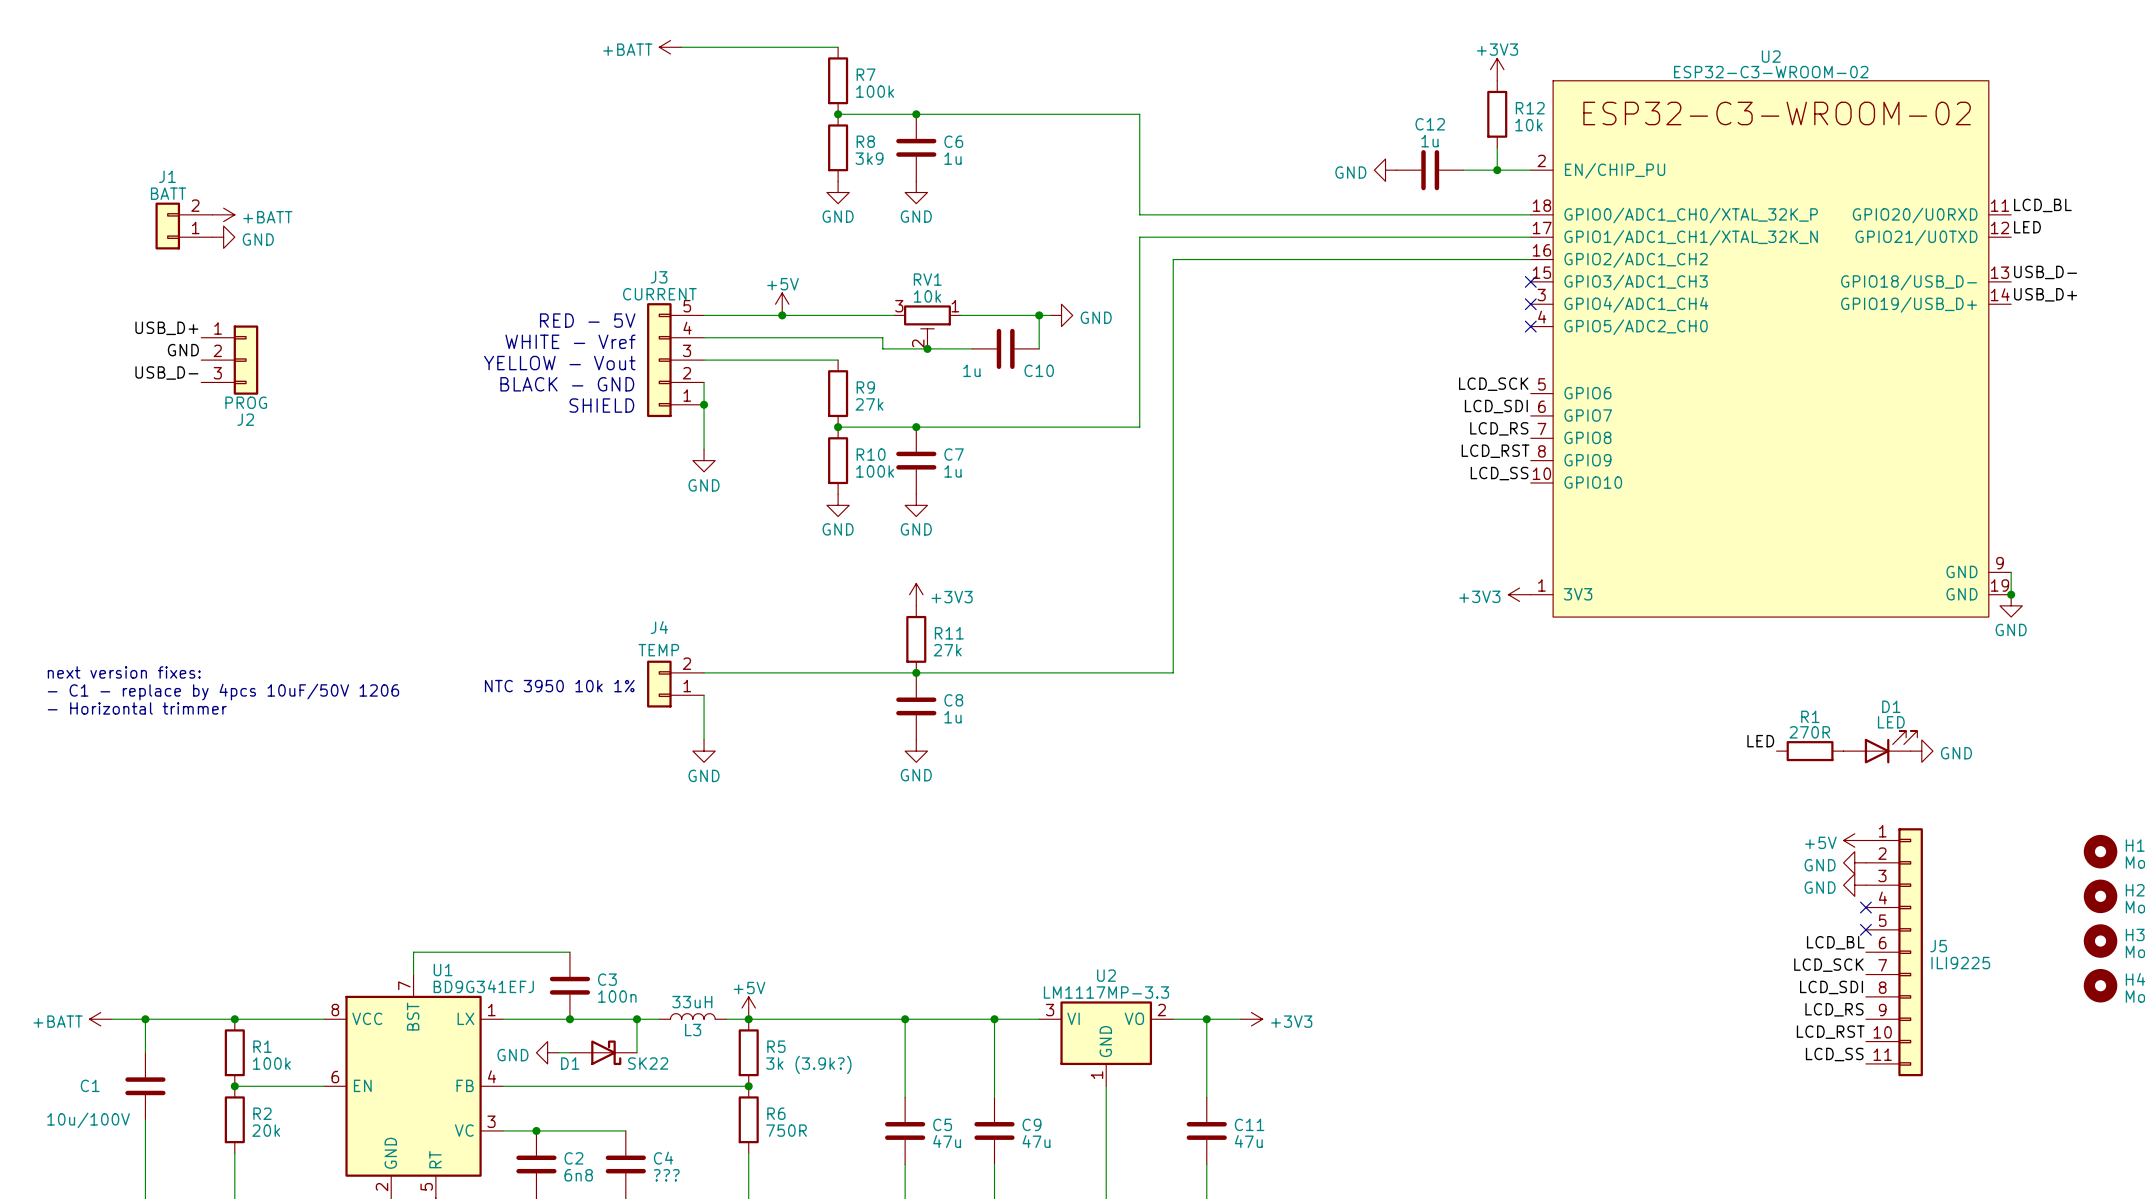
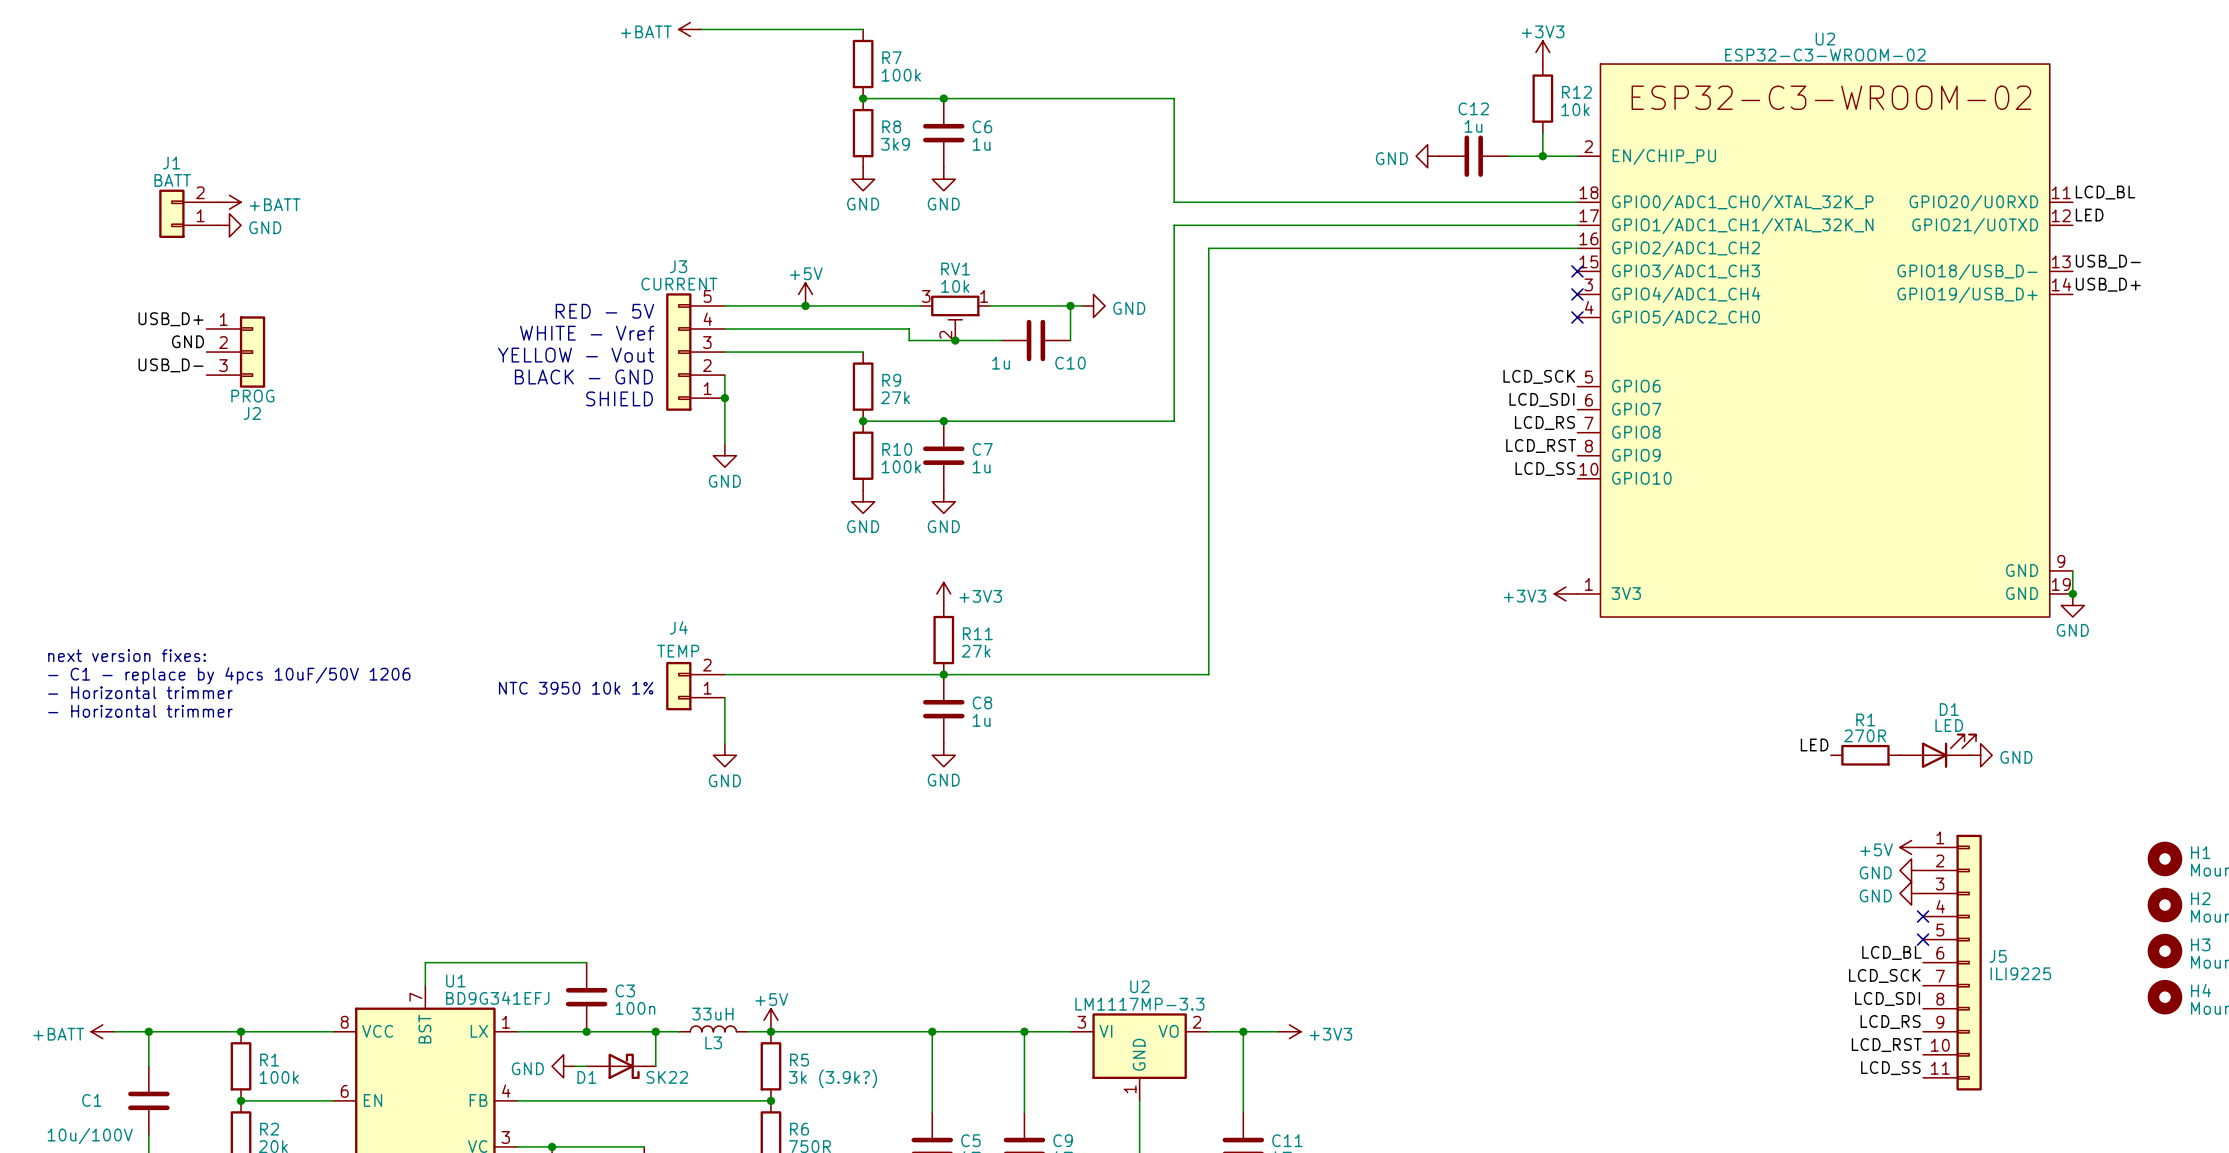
text: none -> next version fixes: (127, 655)
text: next version fixes: (124, 672) -> - C1 - replace by 4pcs 10uF/50V 1206 (229, 675)
text: - C1 - replace by 4pcs 10uF/50V 1206 (223, 692) -> - Horizontal trimmer (140, 692)

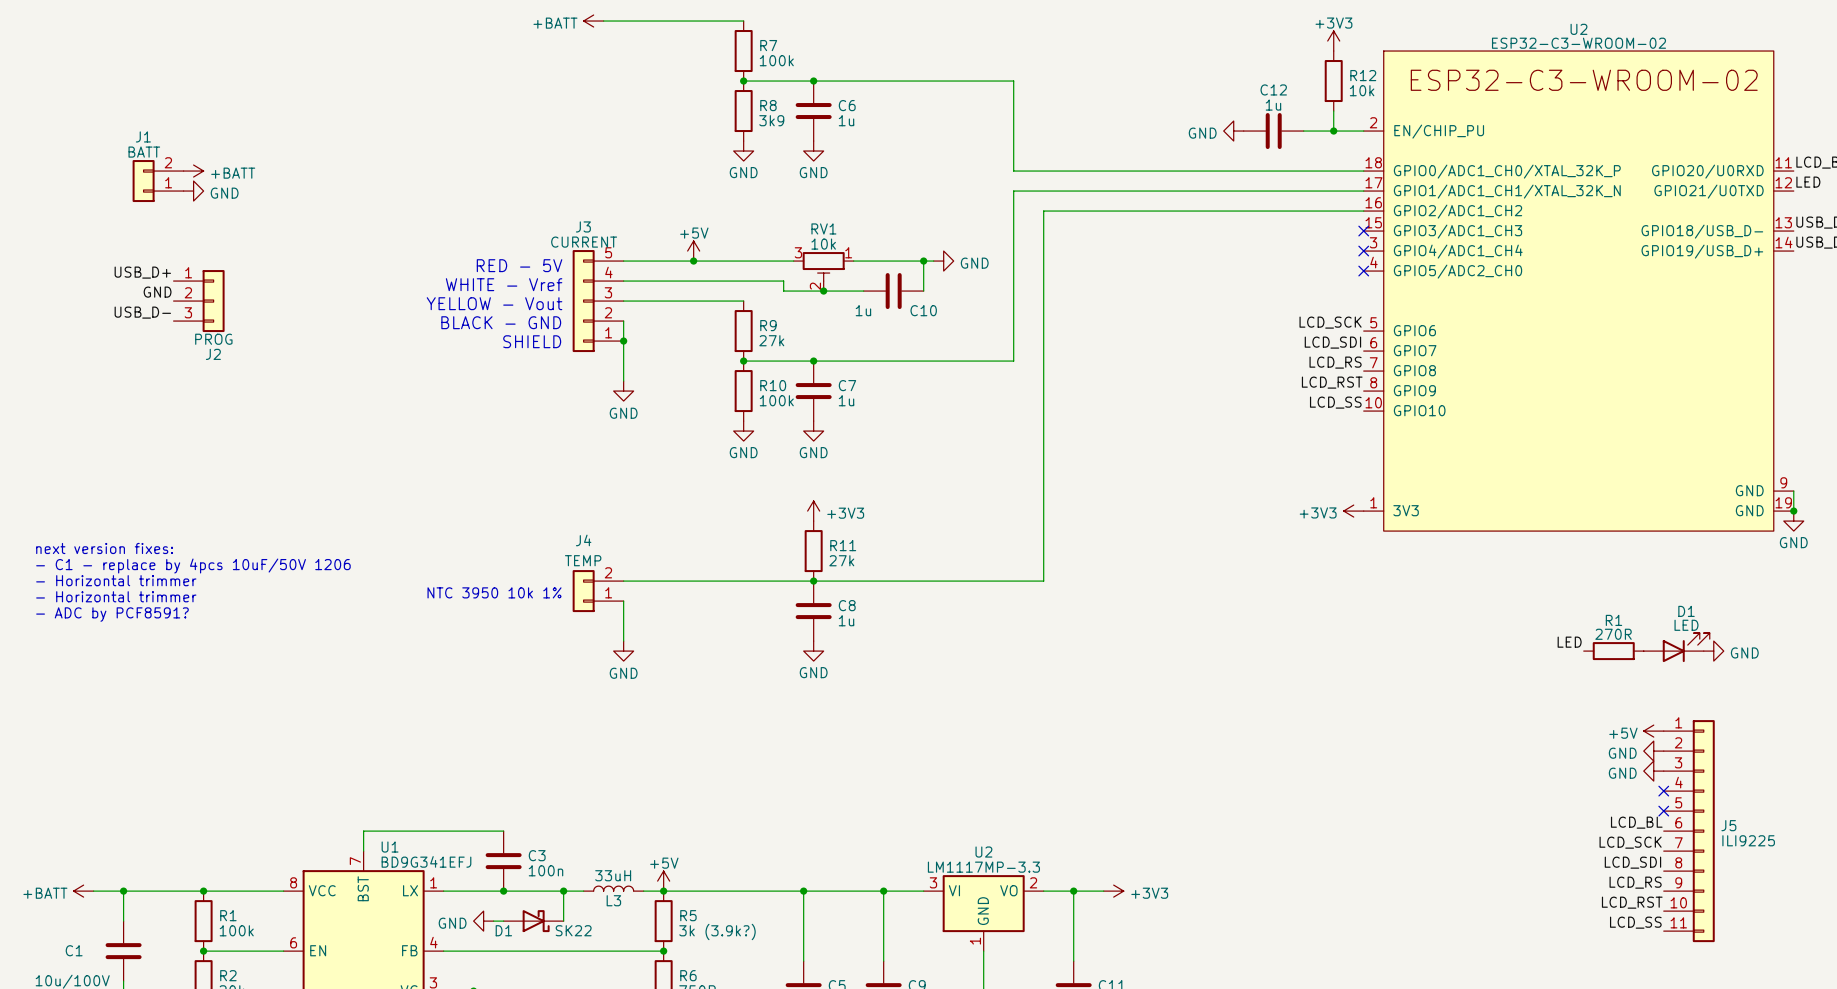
text: none -> next version fixes: (104, 548)
text: next version fixes: (127, 655) -> - C1 - replace by 4pcs 10uF/50V 1206 (193, 566)
text: - C1 - replace by 4pcs 10uF/50V 1206 (229, 675) -> - Horizontal trimmer (116, 580)
text: - Horizontal trimmer (140, 711) -> - ADC by PCF8591? (112, 614)

